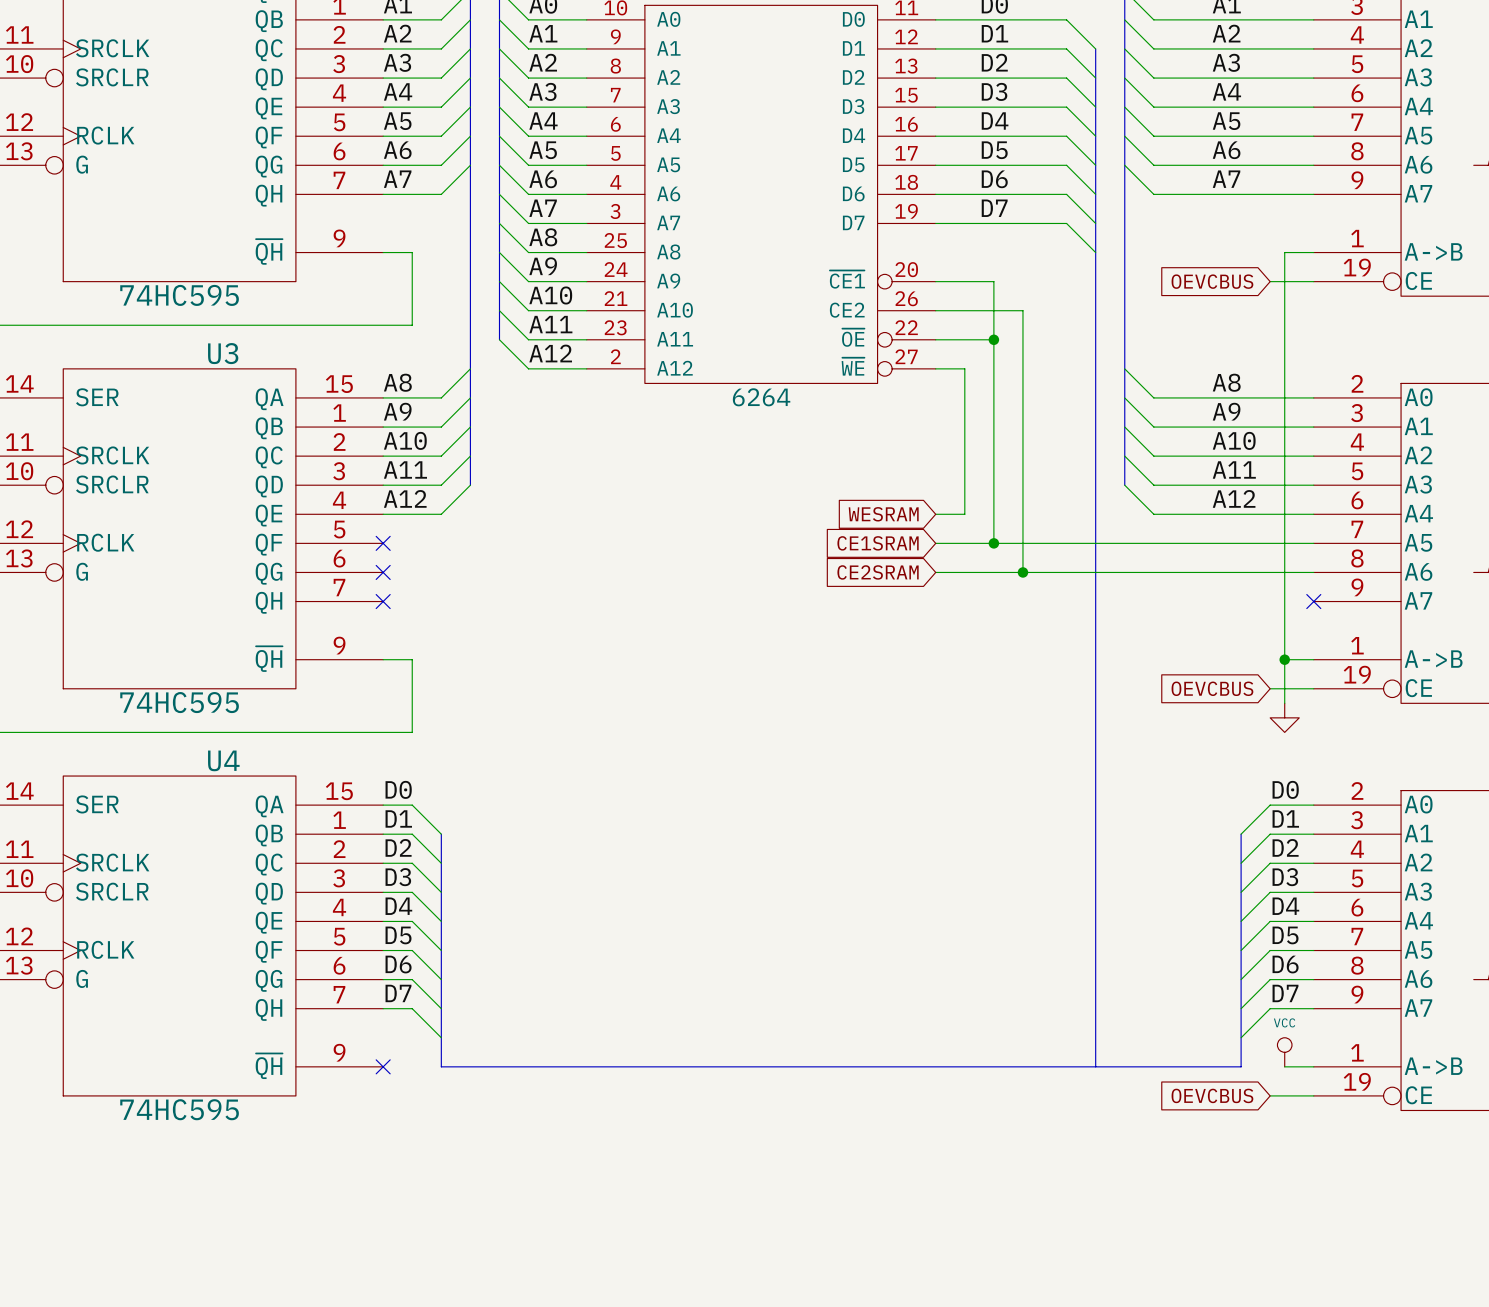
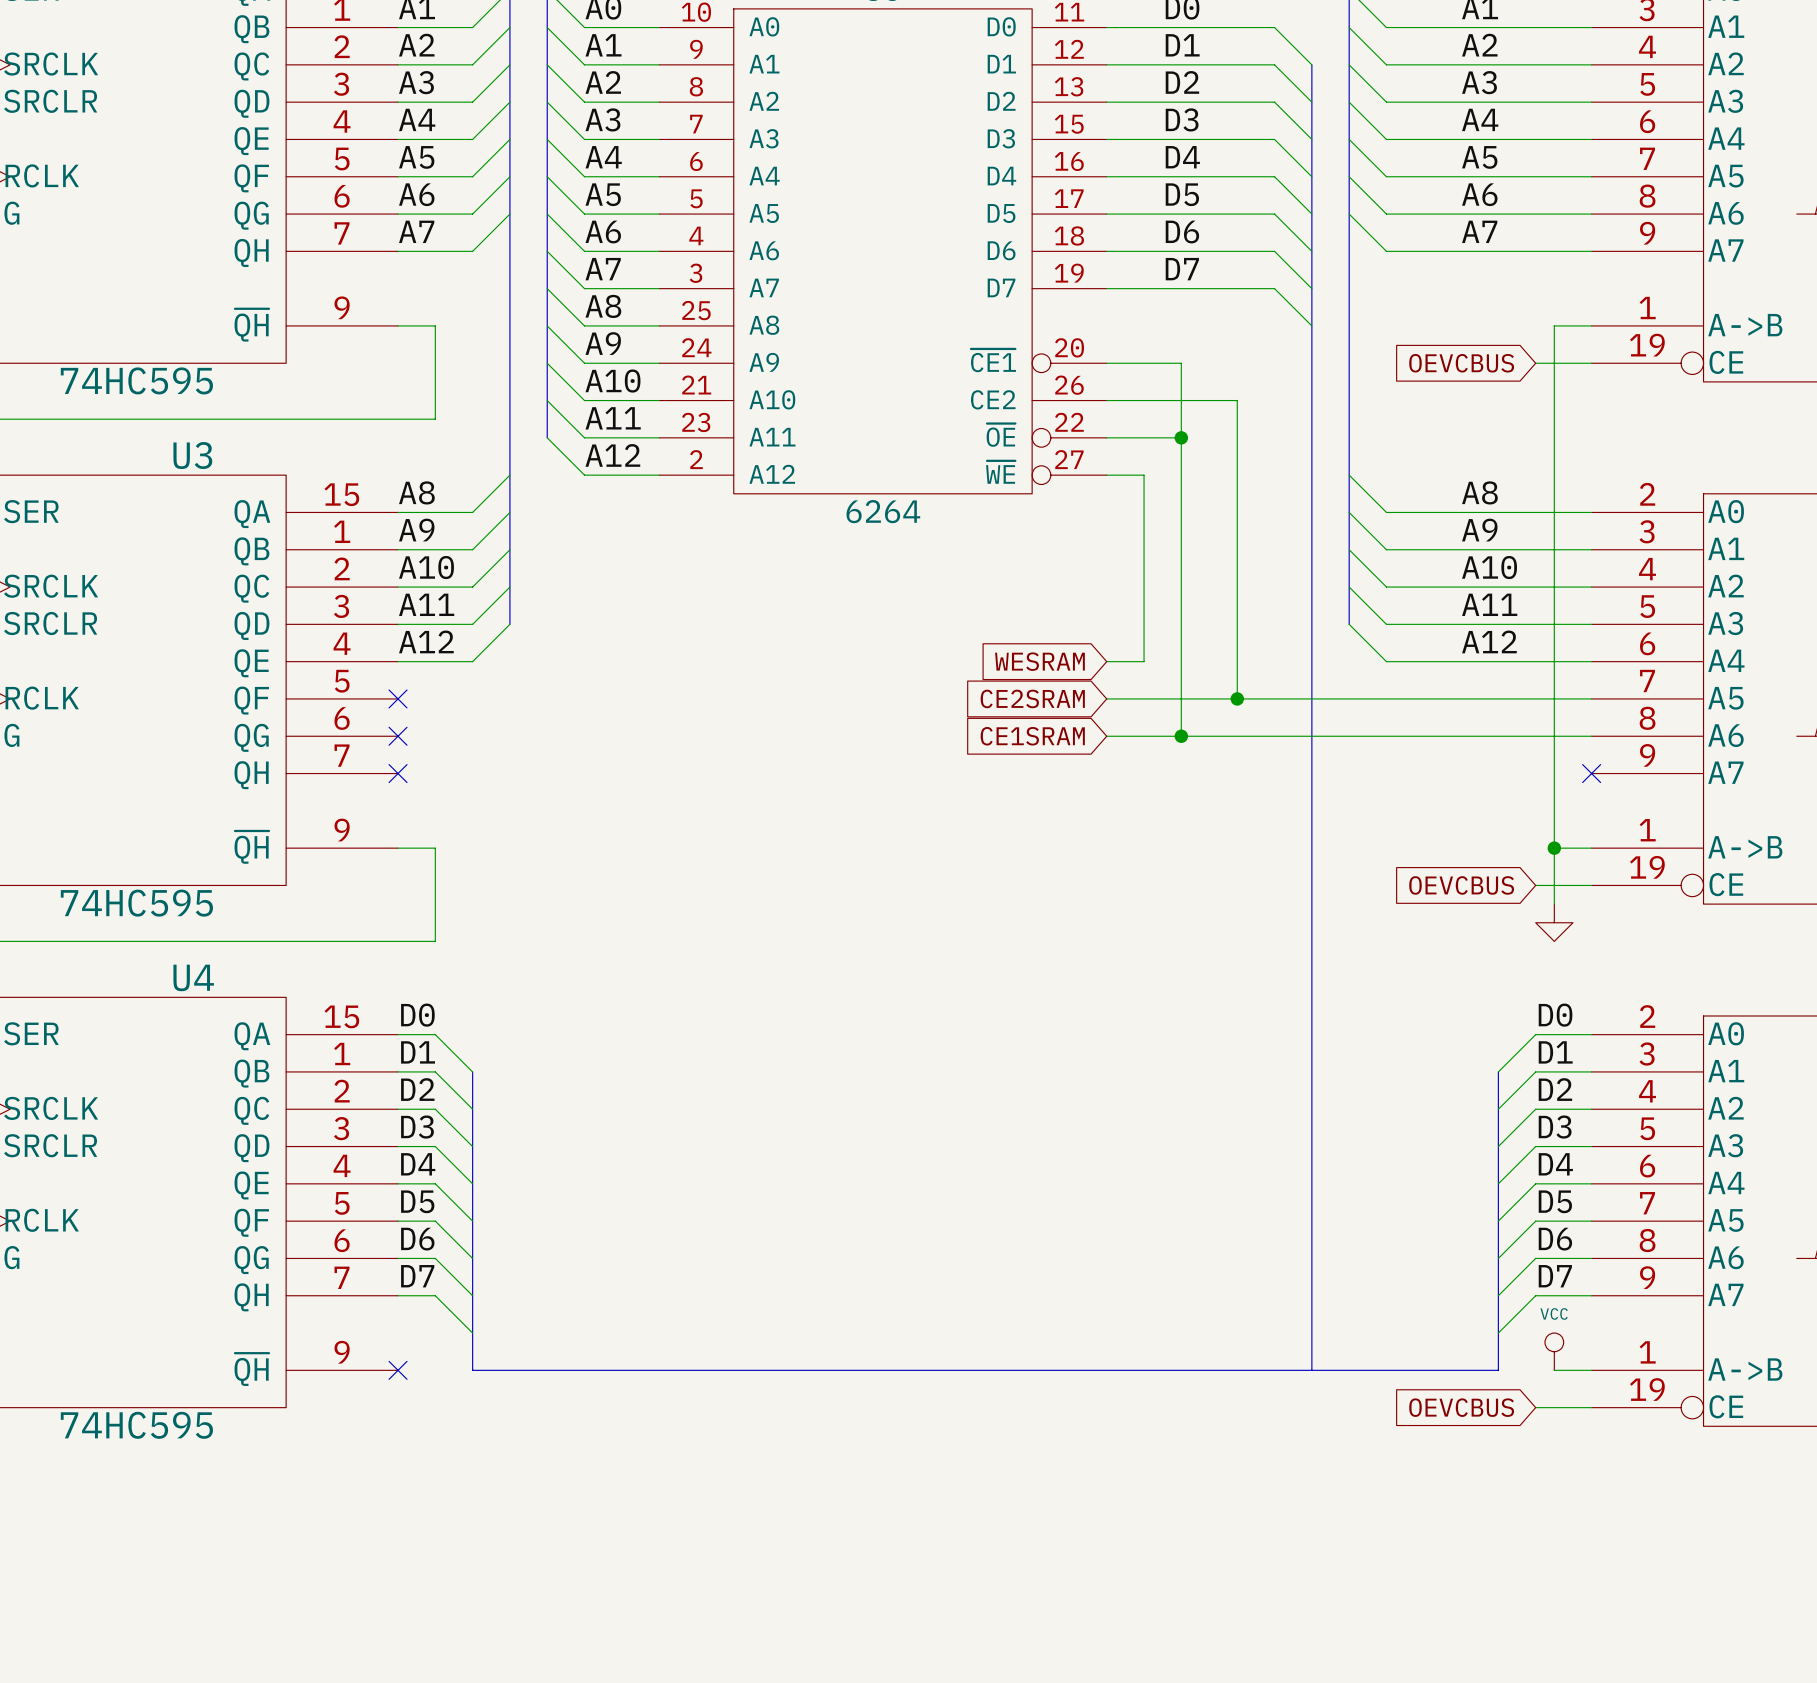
wire: (1022, 310) (1022, 572) -> (1218, 400) (1237, 400) (1237, 698)
global label: CE1SRAM (878, 543) -> CE2SRAM (1032, 698)
wire: none -> (1181, 698) (1181, 736)
junction: (993, 543) -> none
junction: none -> (1237, 698)
global label: CE2SRAM (878, 572) -> CE1SRAM (1032, 736)
junction: none -> (1181, 736)
junction: (1022, 572) -> none

